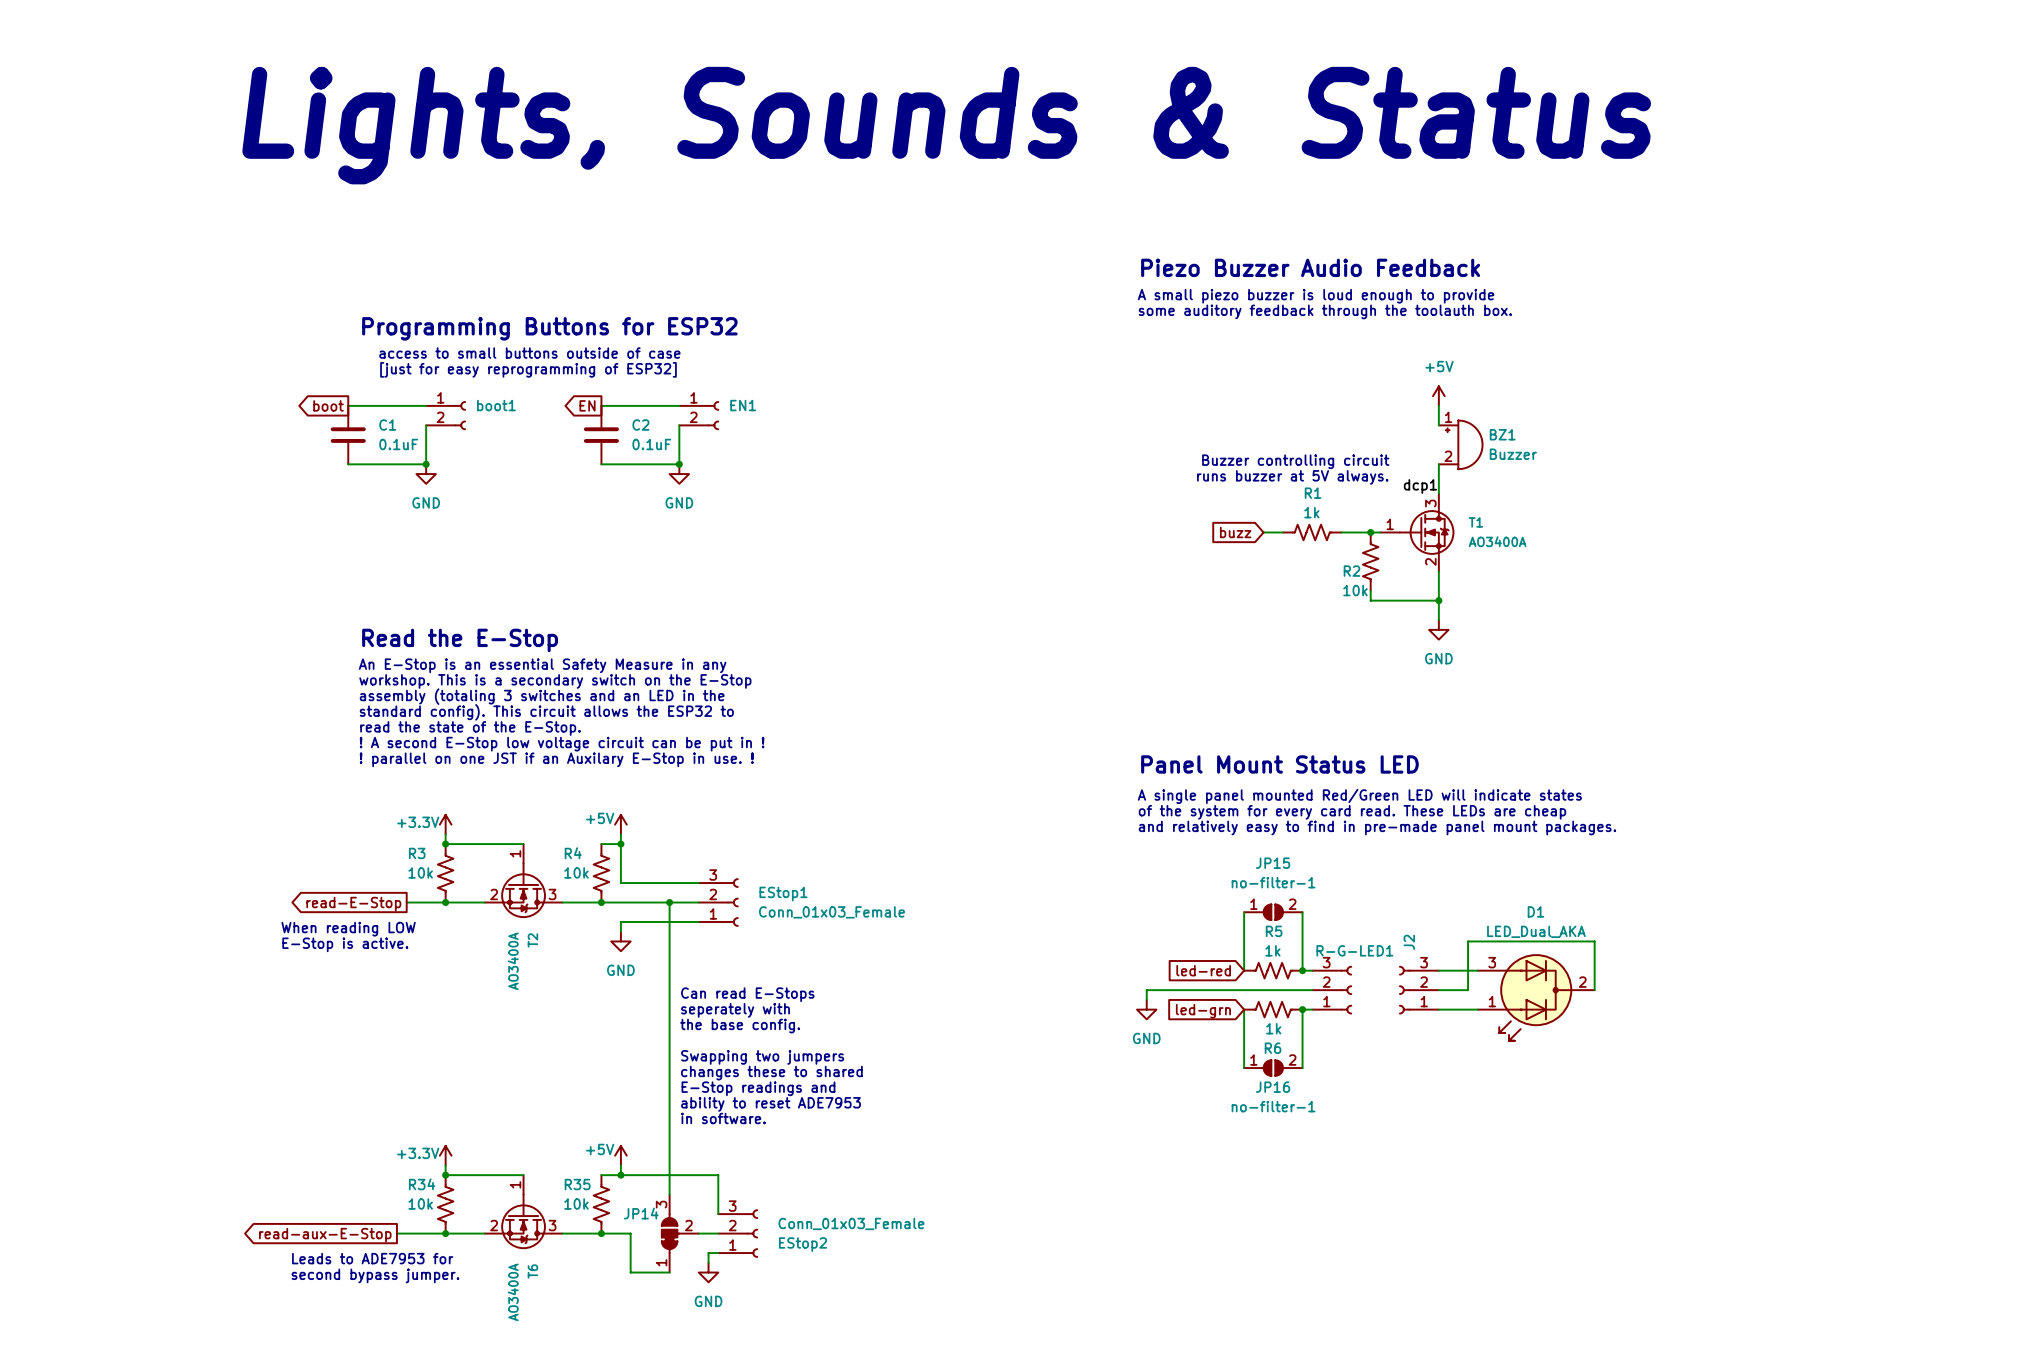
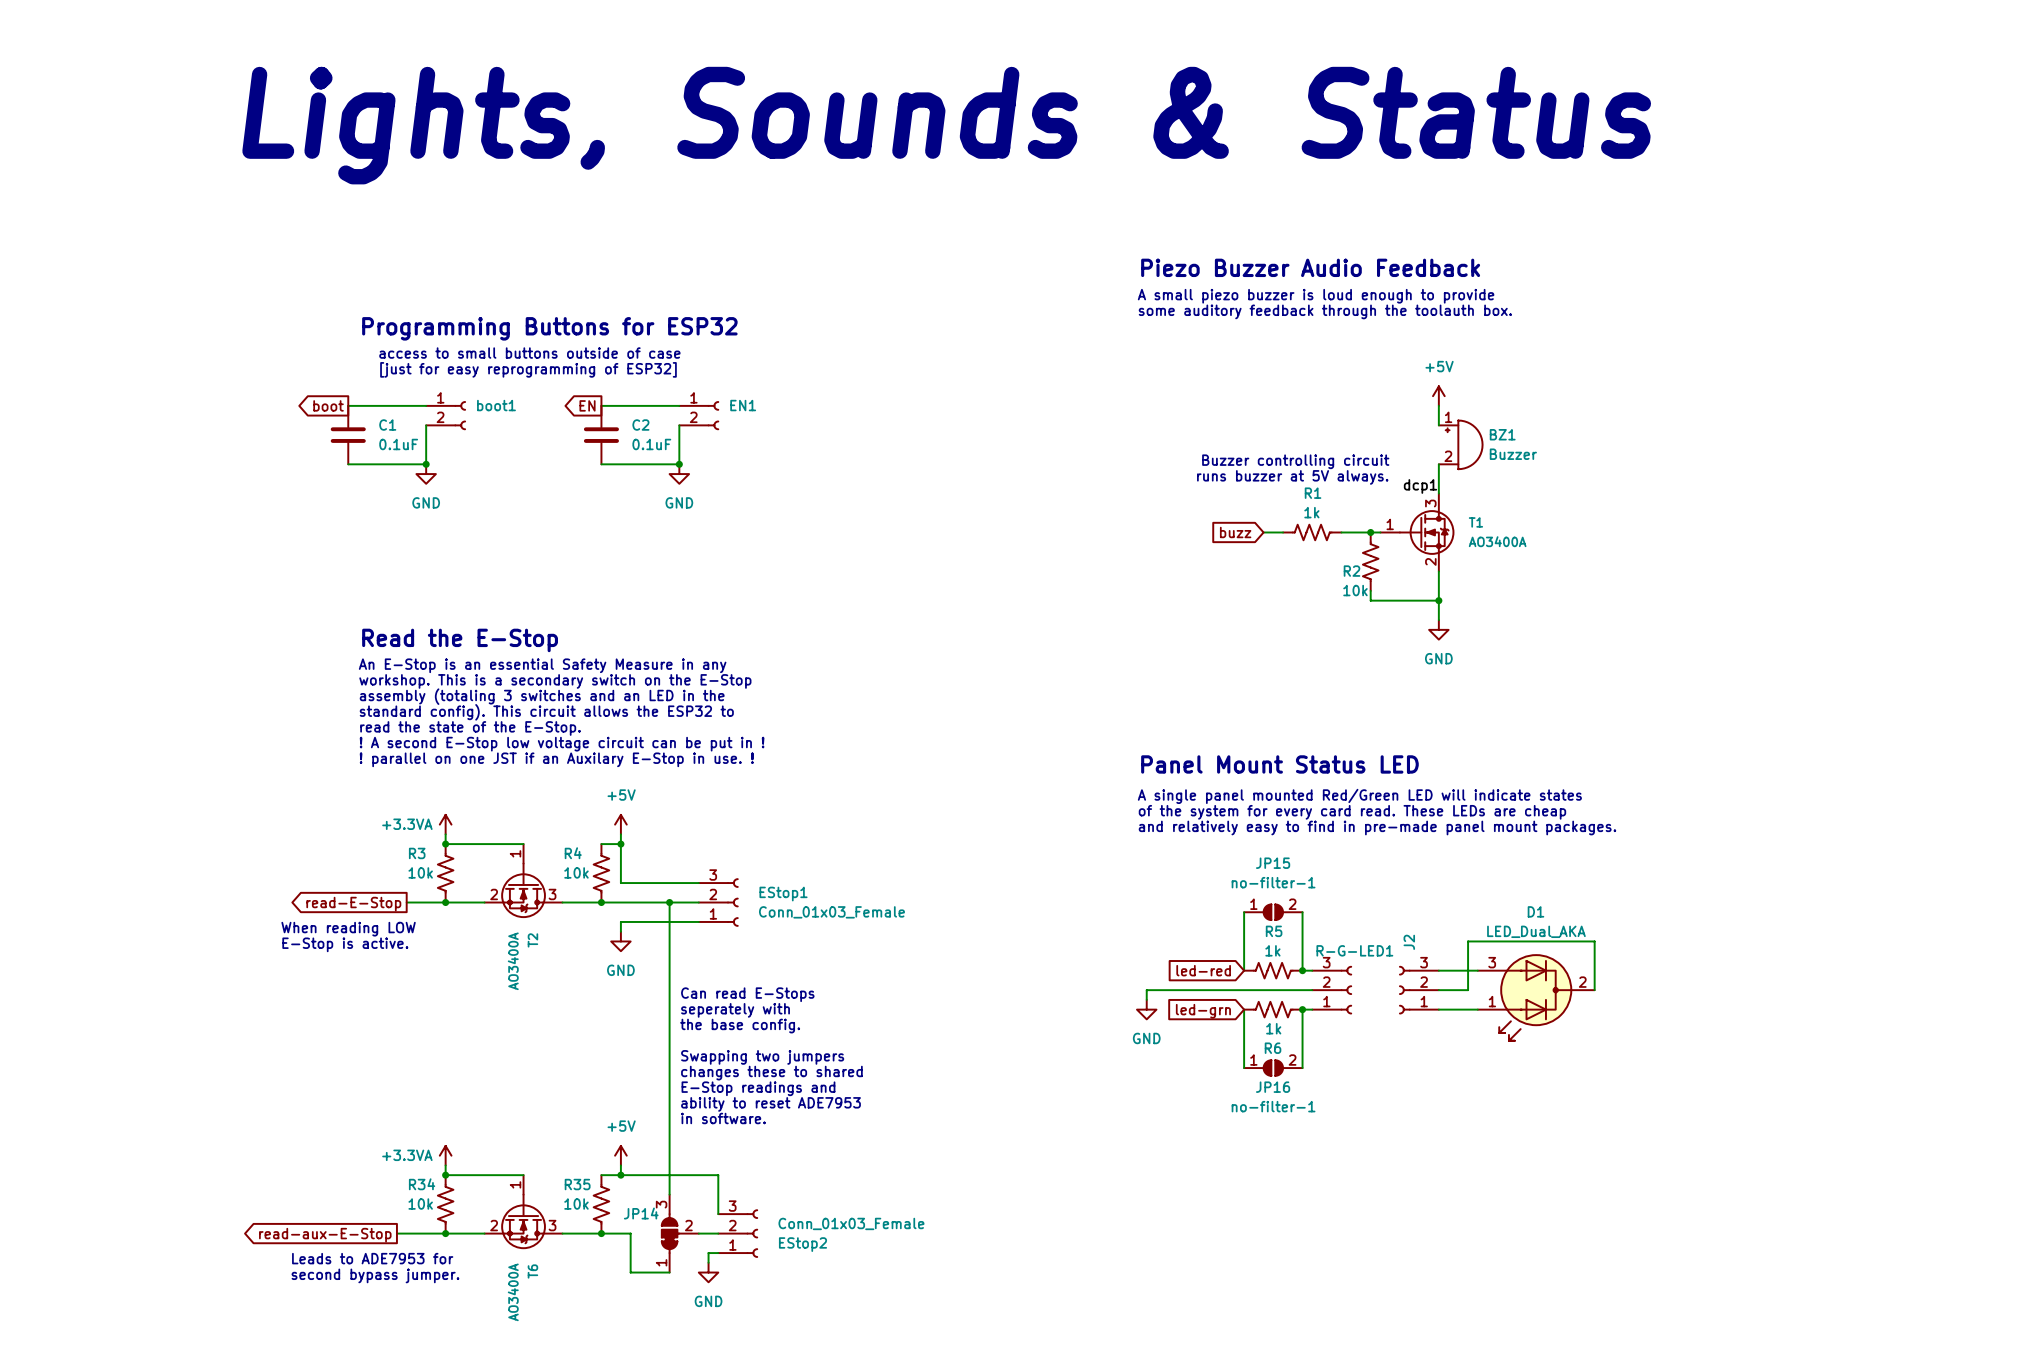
power symbol text position: +5V (600, 818) -> +5V (621, 795)
power symbol: +3.3V (445, 824) -> +3.3VA (445, 824)
power symbol text position: +5V (600, 1149) -> +5V (621, 1126)
power symbol: +3.3V (445, 1155) -> +3.3VA (445, 1155)

